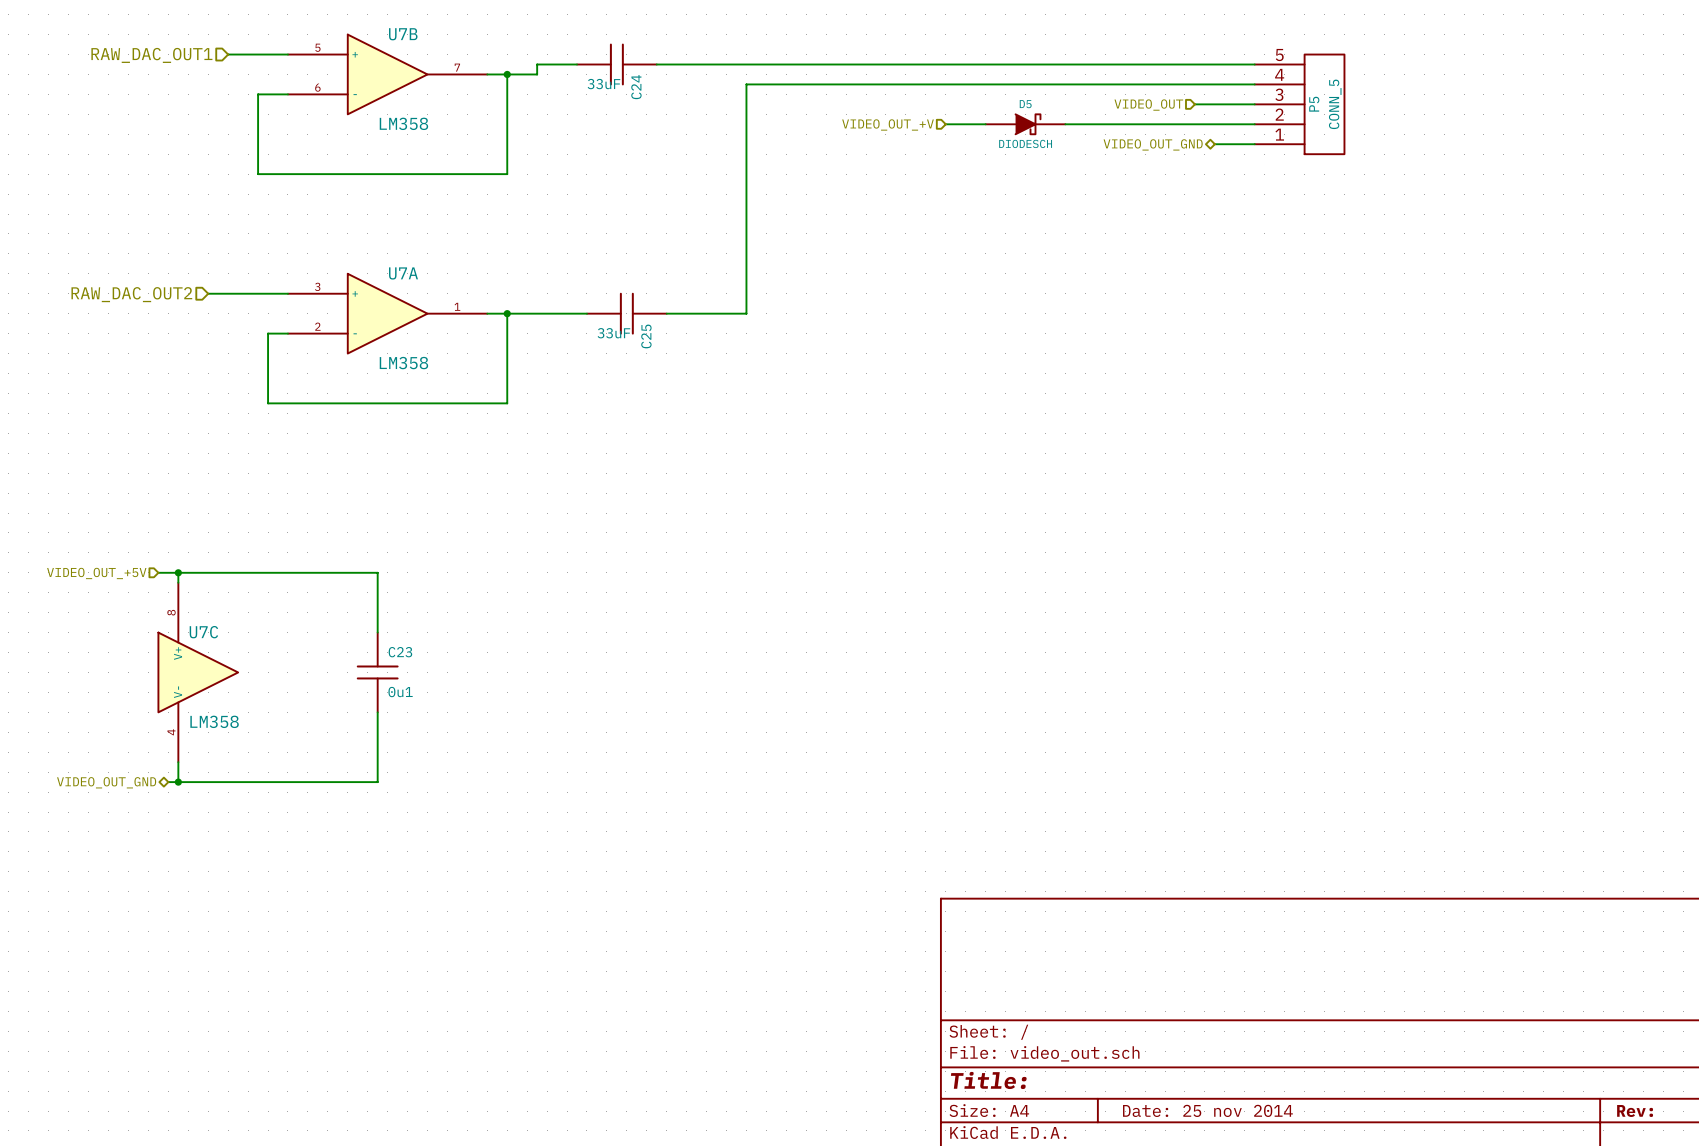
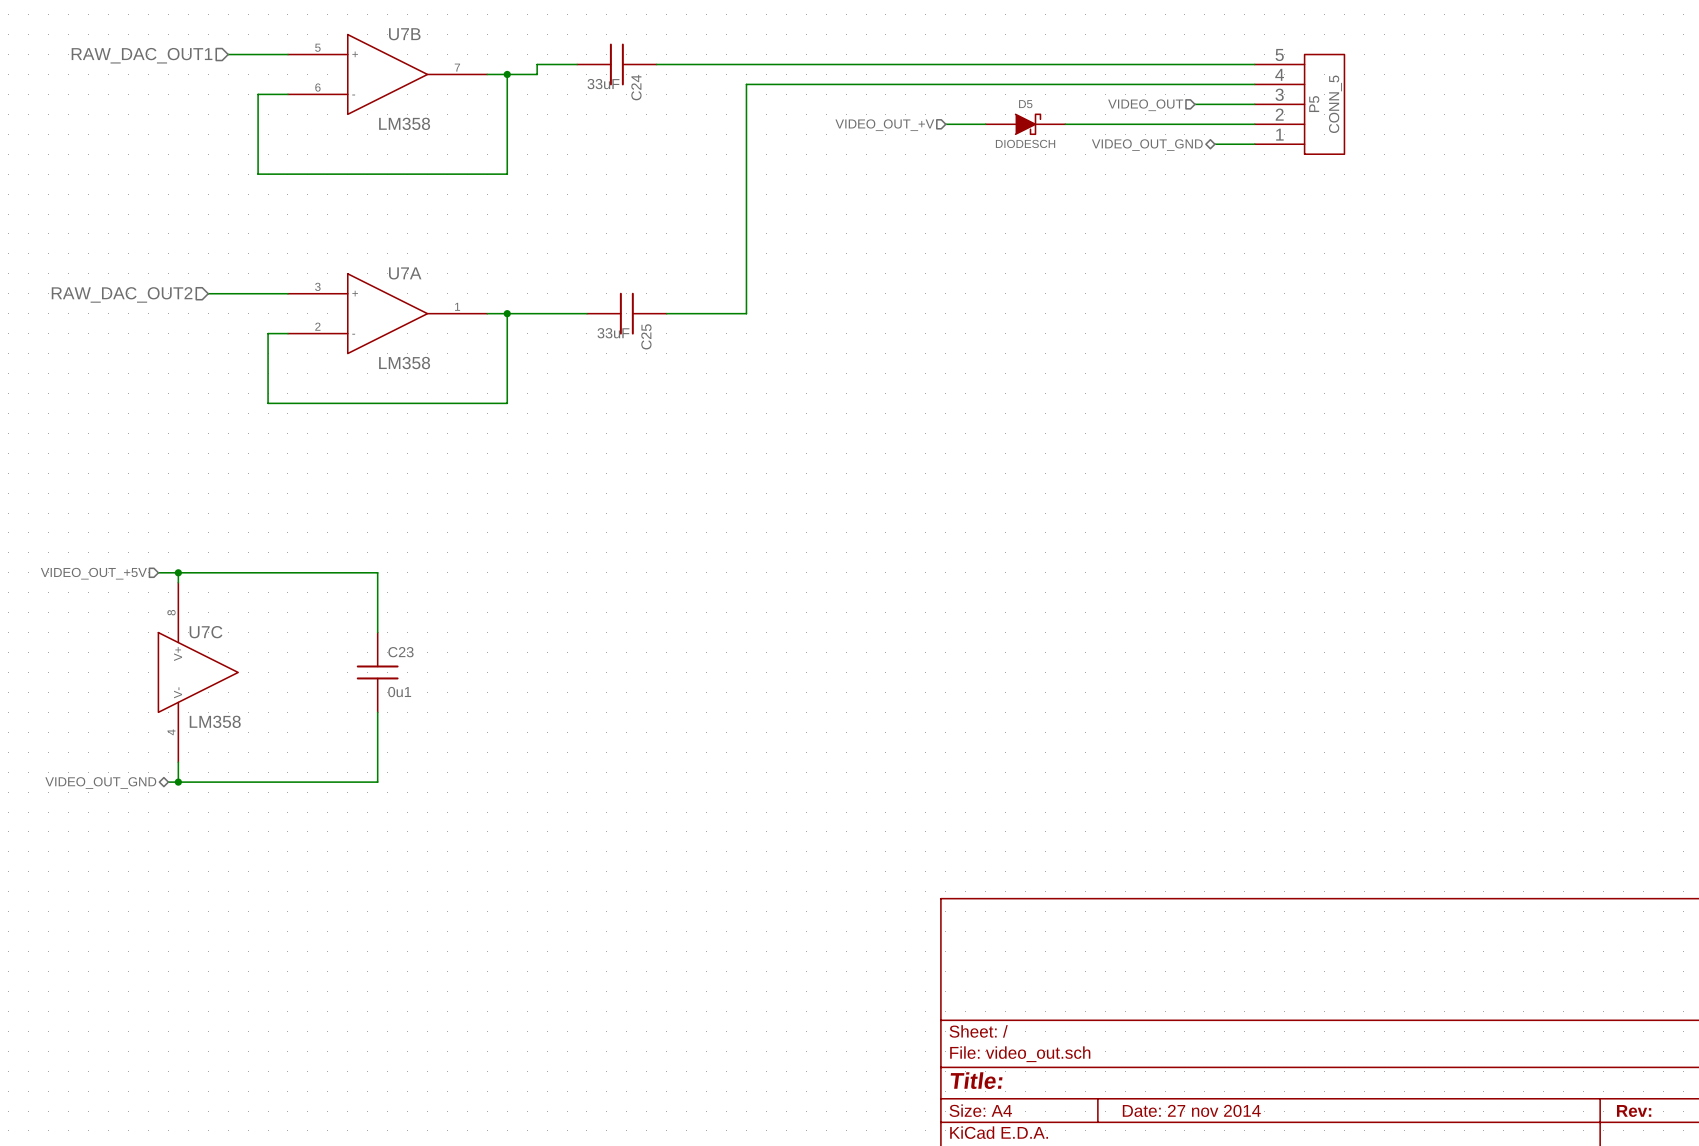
title block: Date: 25 nov 2014 (1207, 1110) -> Date: 27 nov 2014 (1191, 1110)

